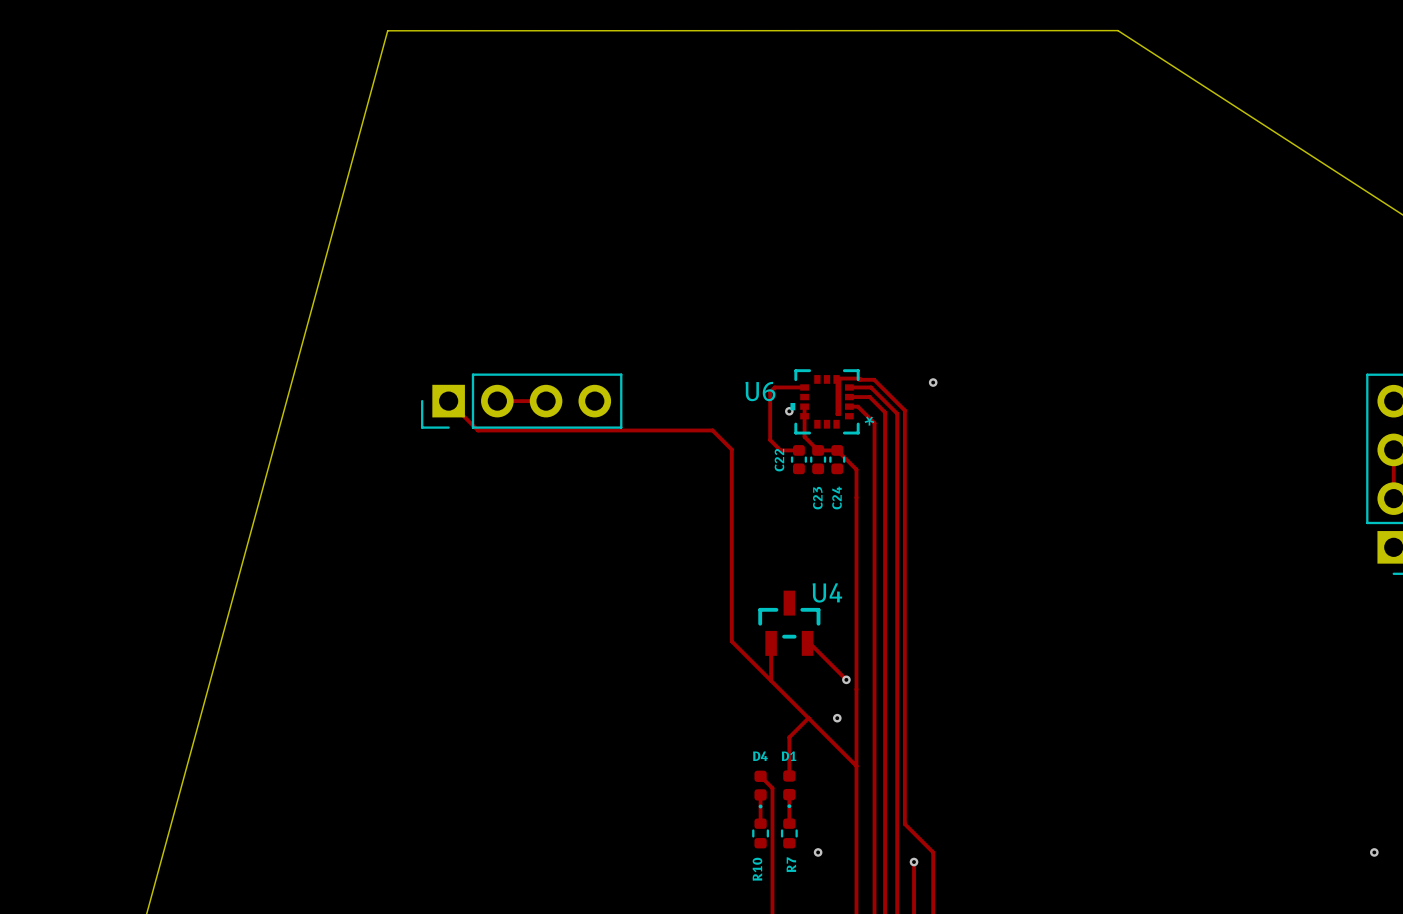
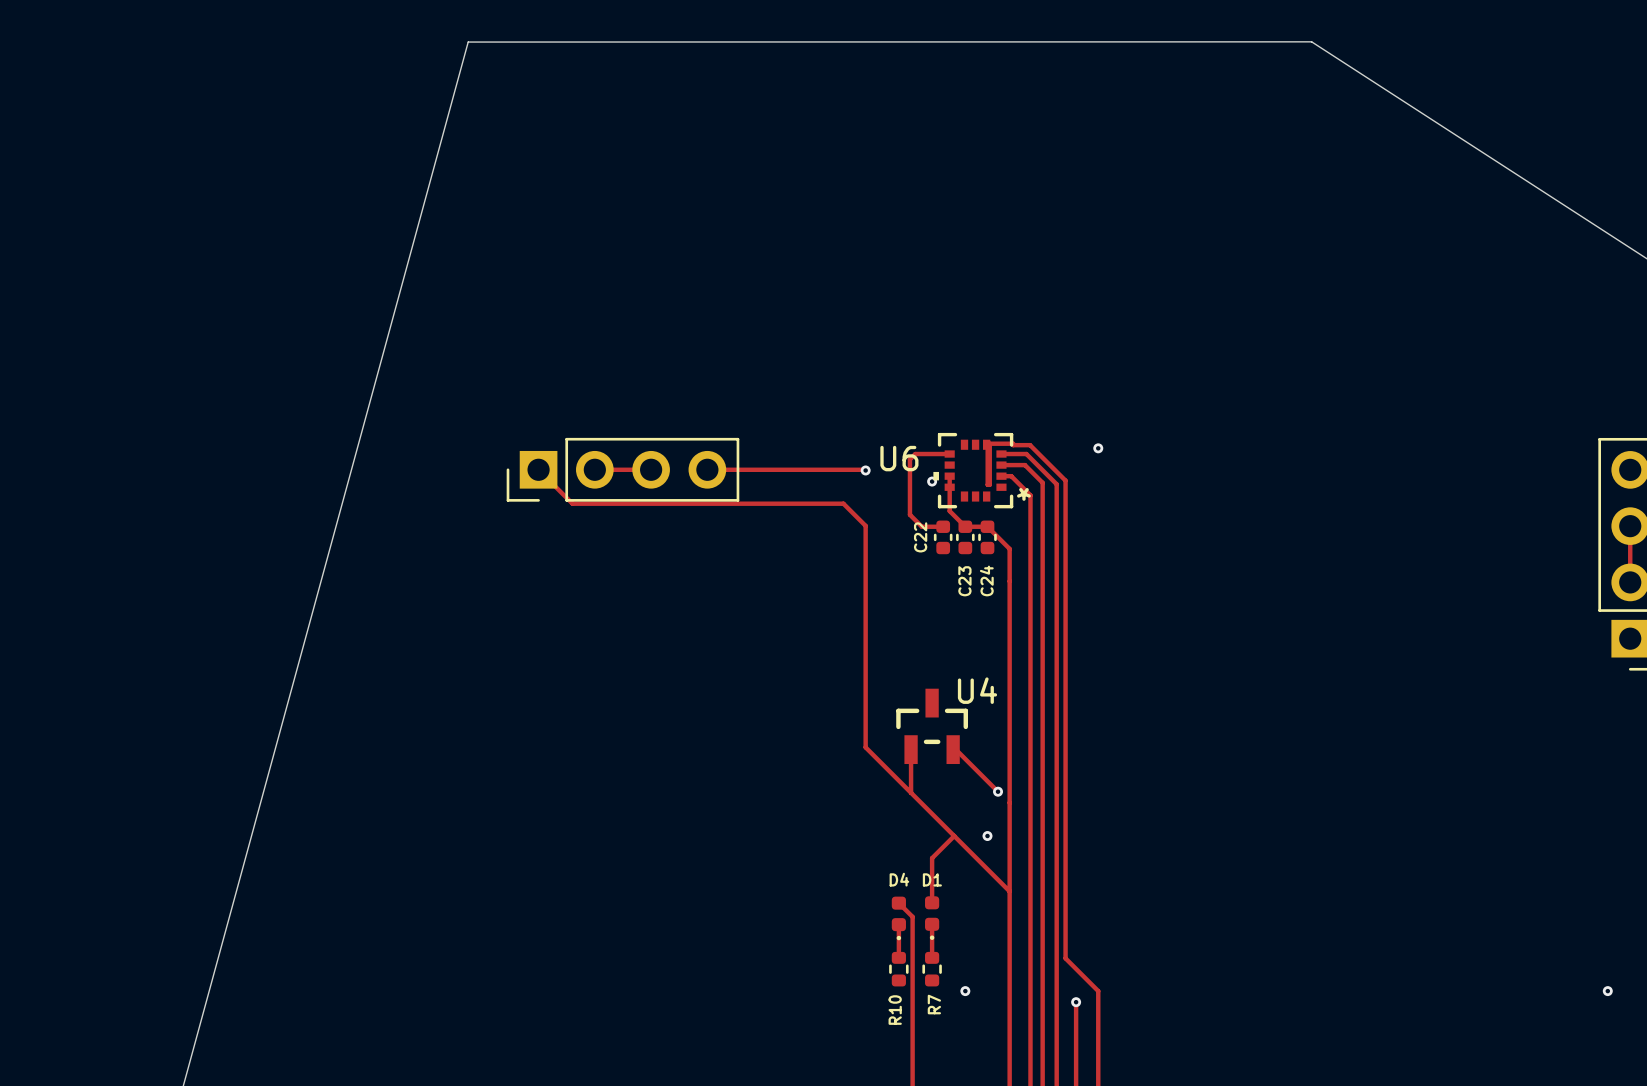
track: none -> (707, 469) (865, 470)
via: none -> (865, 470)

